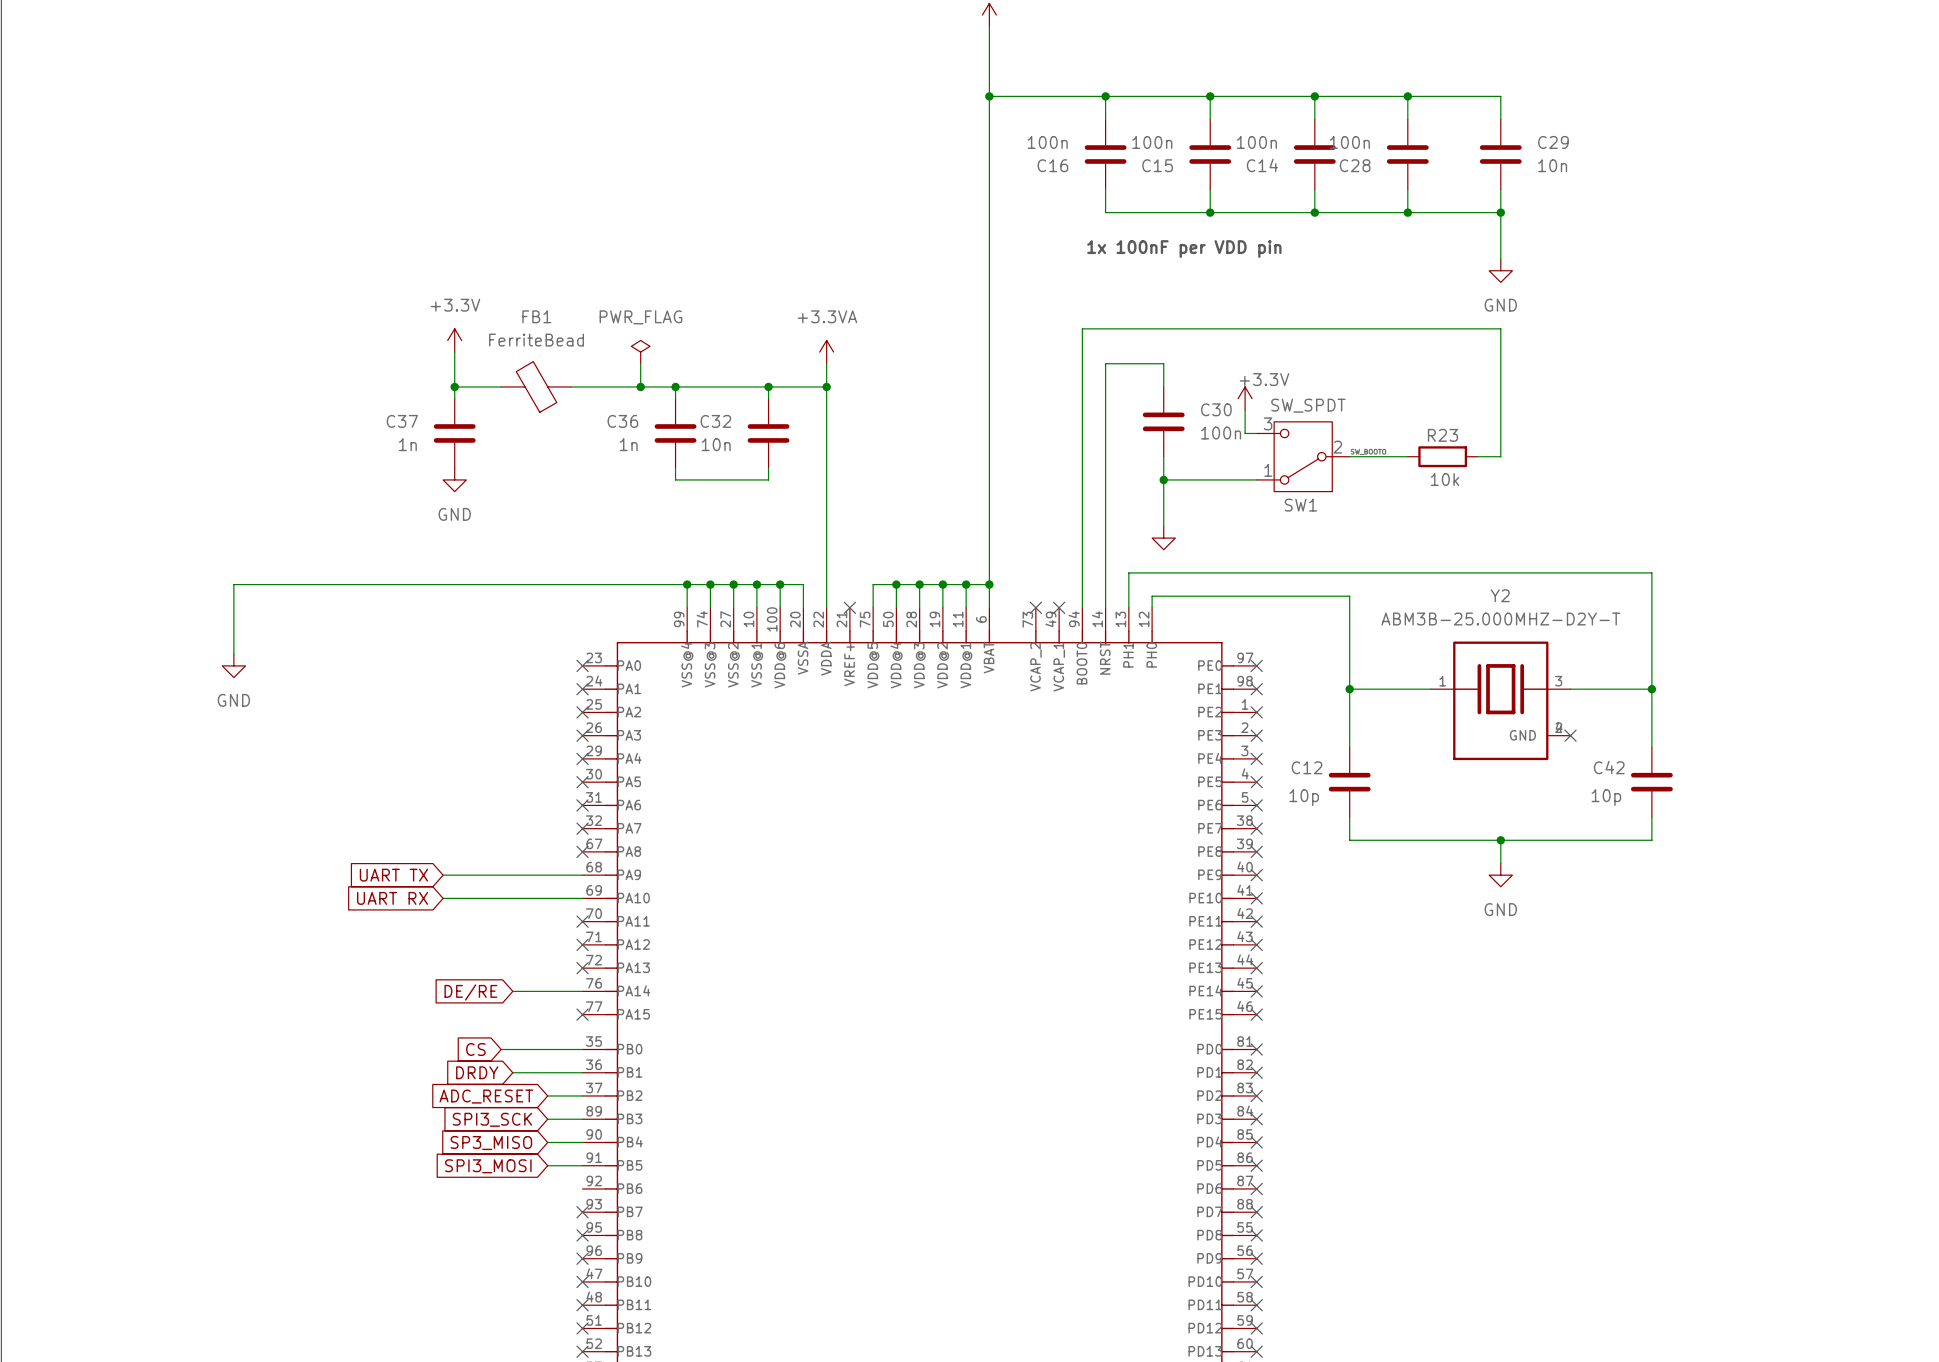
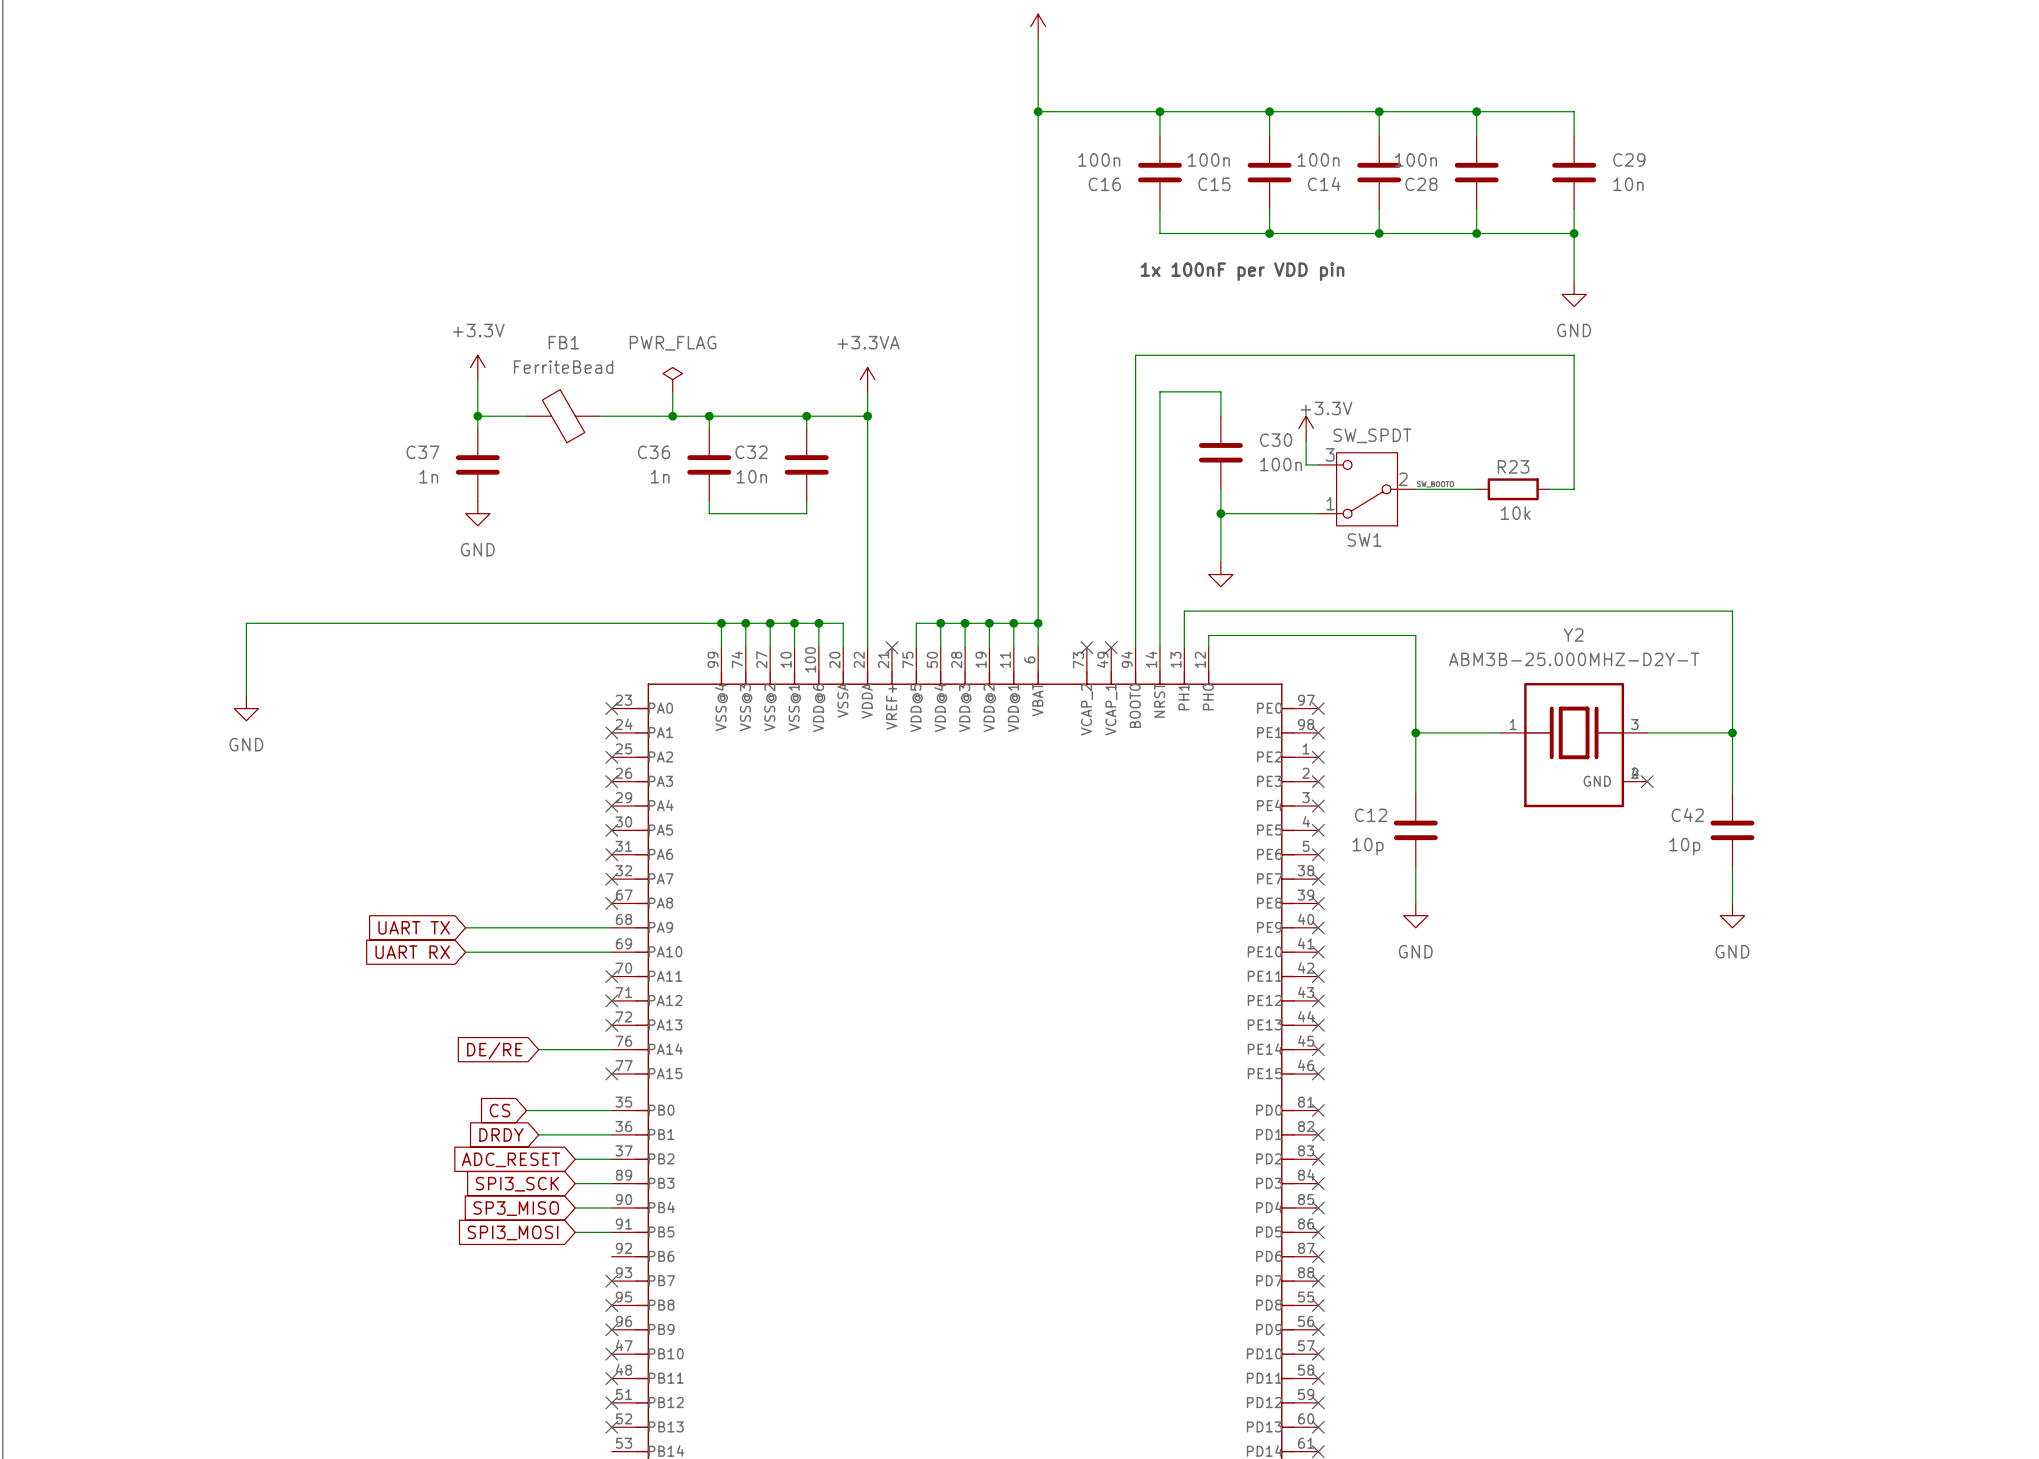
wire: (1349, 840) (1651, 840) -> (1415, 891) (1415, 903)
wire: (1500, 840) (1500, 863) -> none
junction: (1500, 840) -> none
wire: none -> (1732, 891) (1732, 903)
power symbol: none -> GND (1415, 915)
power symbol: none -> GND (1732, 915)
power symbol: GND (1500, 875) -> none

